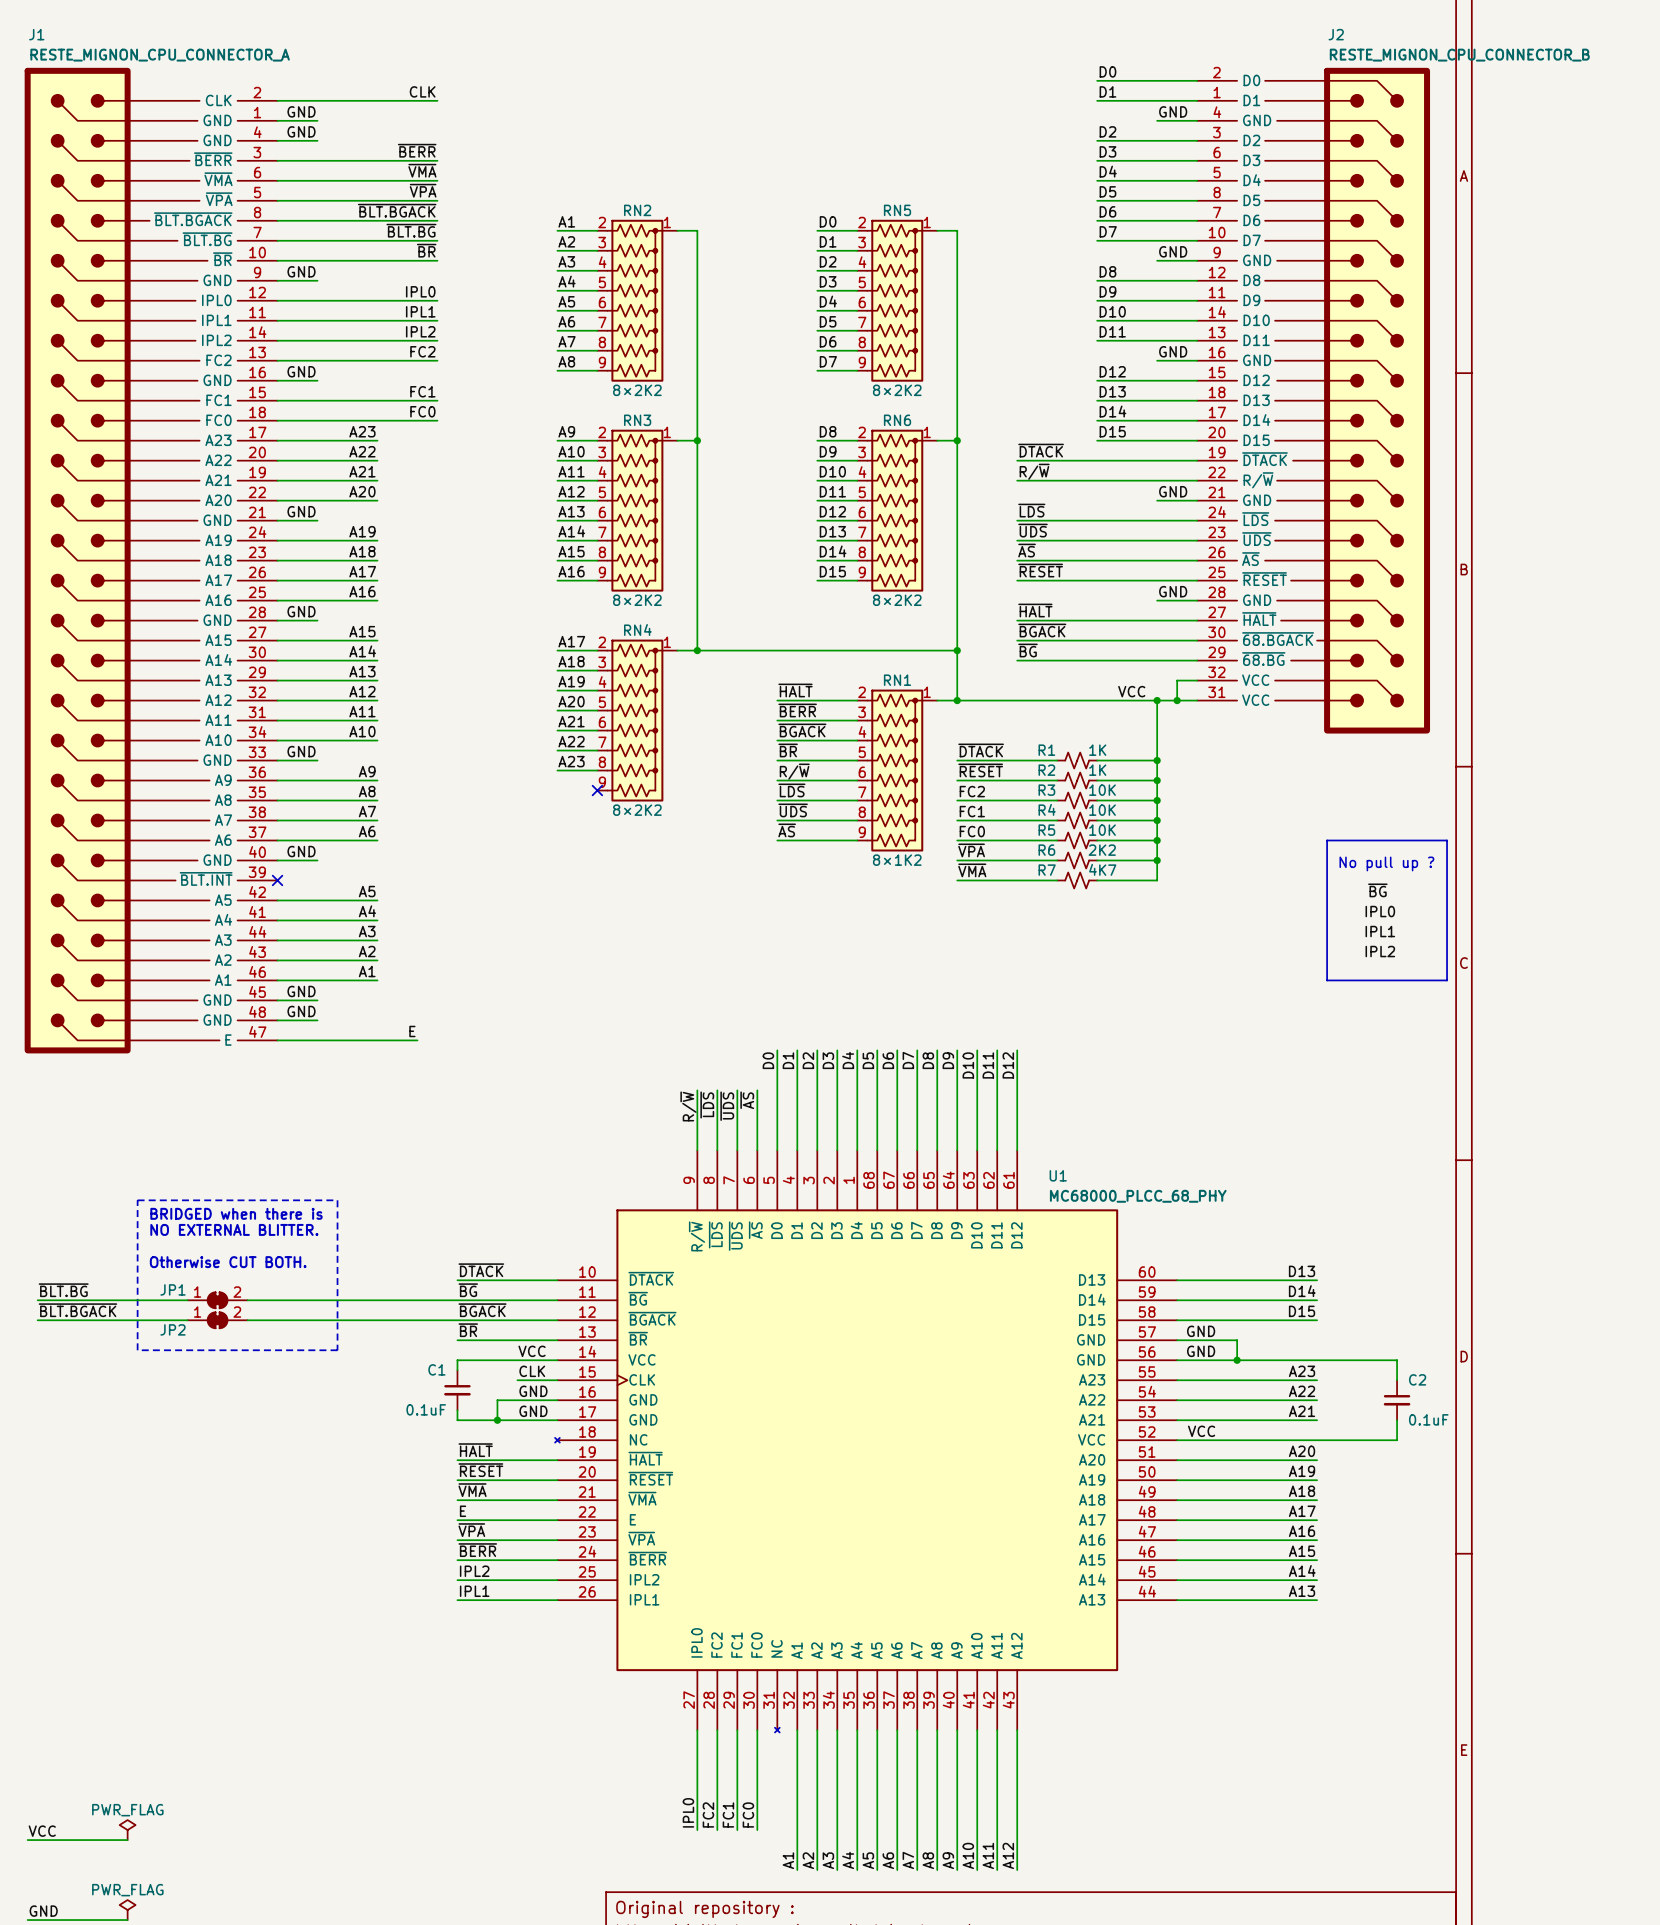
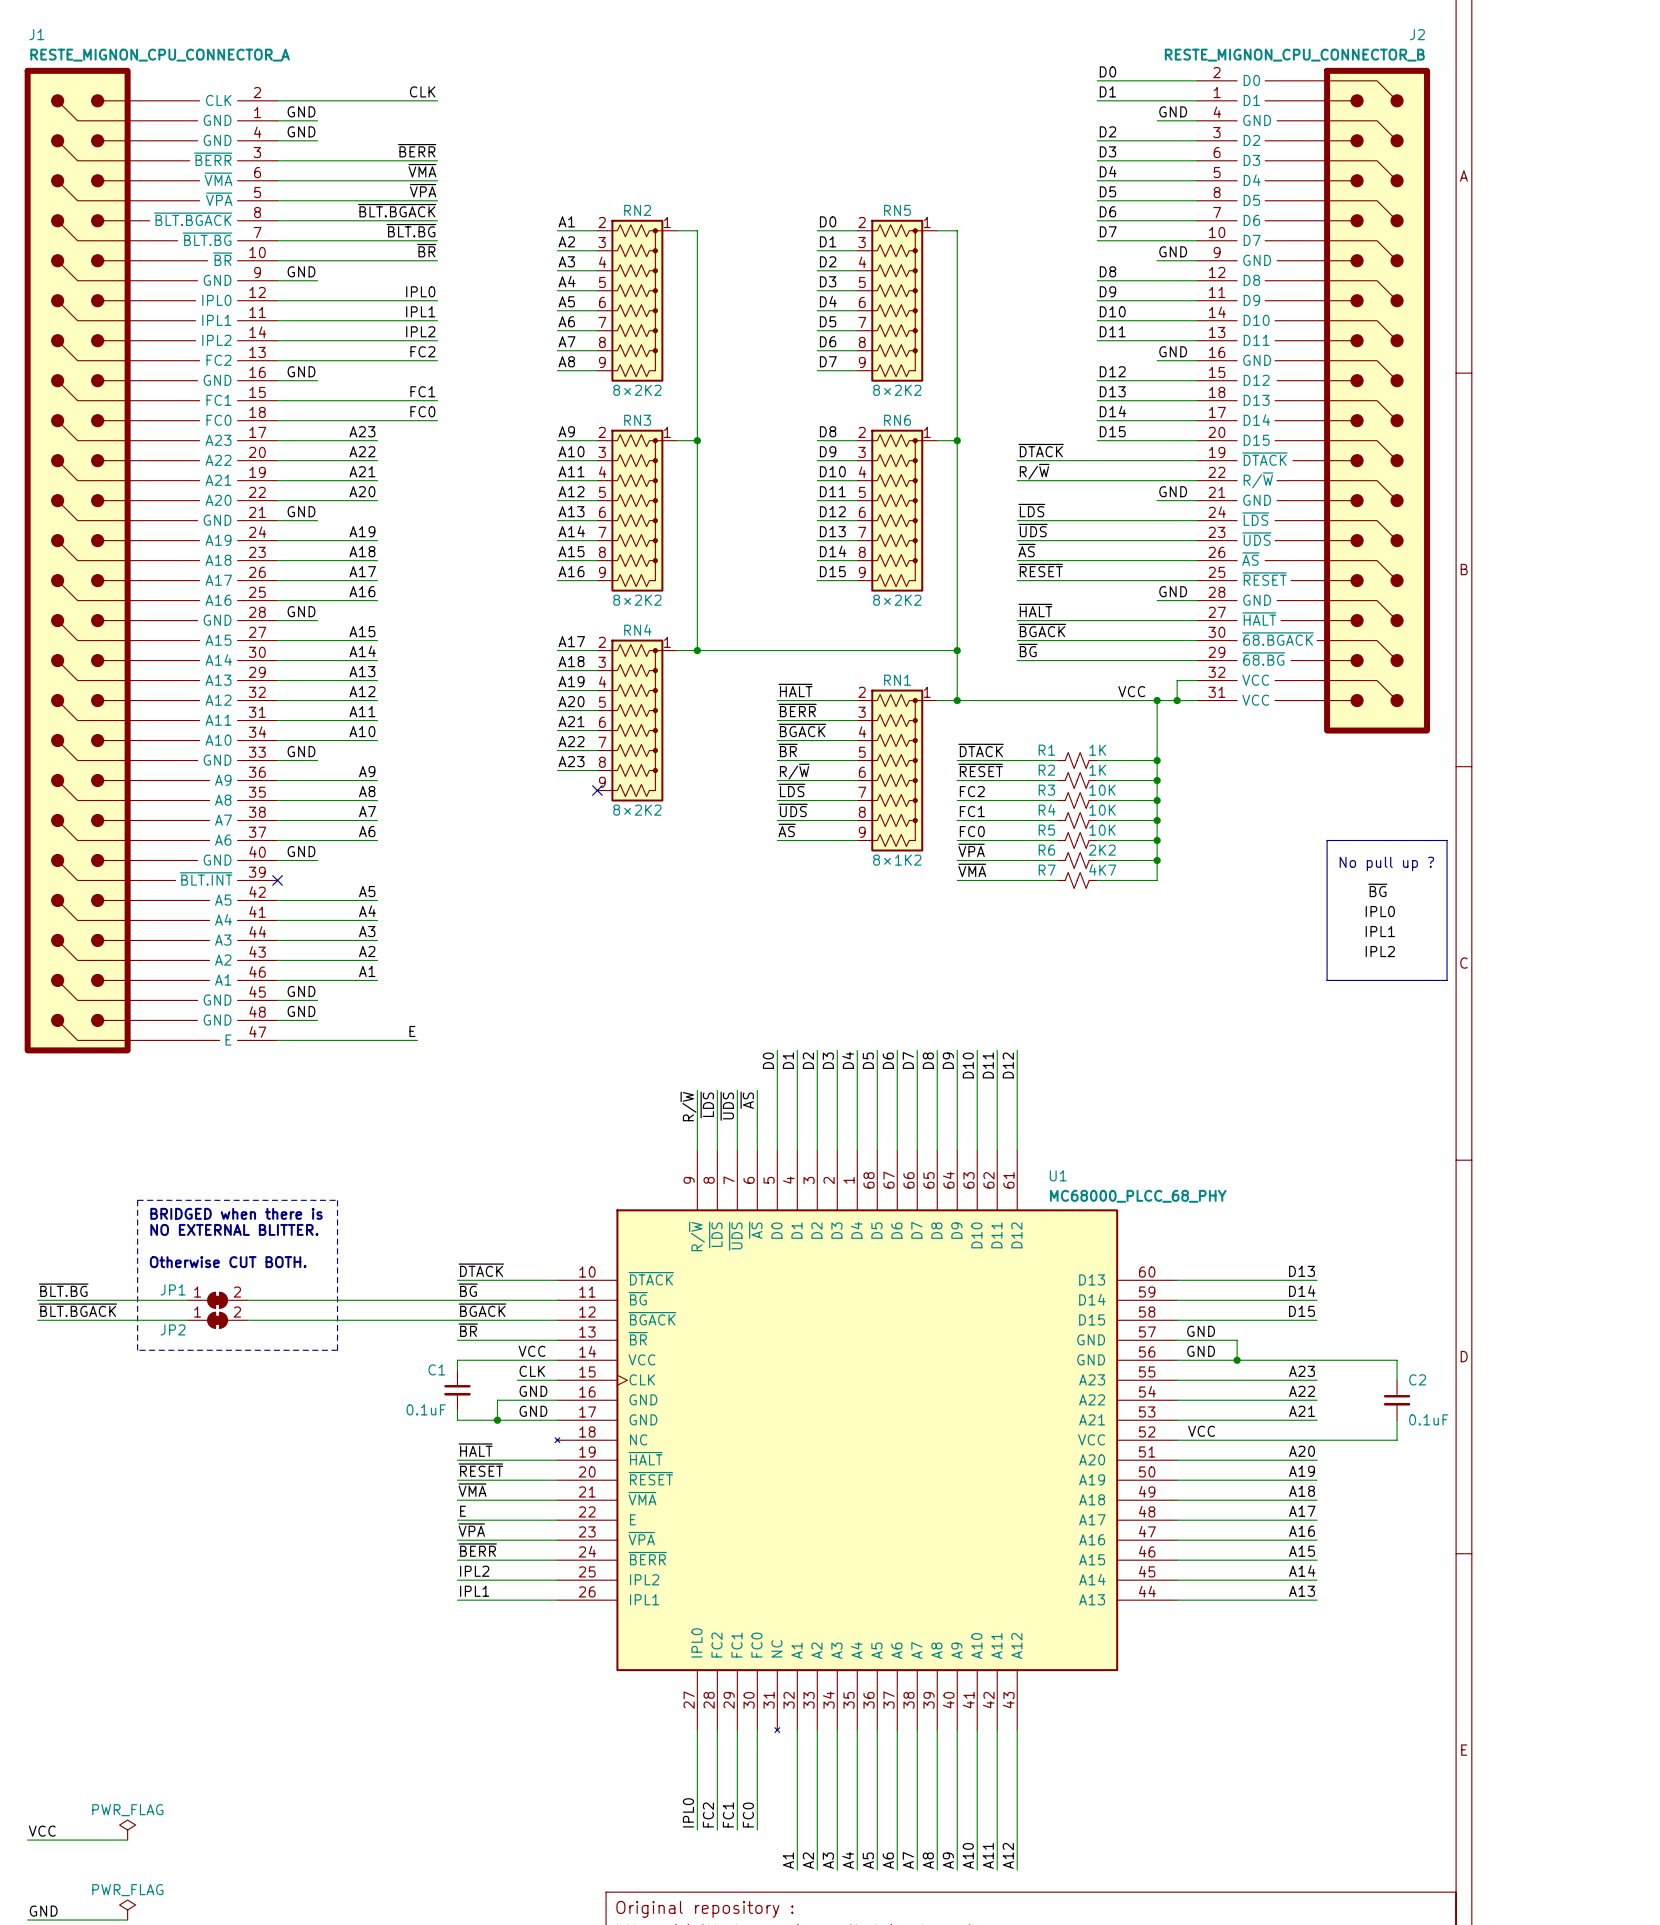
J2 name position: J2 (1336, 34) -> J2 (1417, 34)
J2 value position: RESTE_MIGNON_CPU_CONNECTOR_B (1459, 55) -> RESTE_MIGNON_CPU_CONNECTOR_B (1294, 55)

